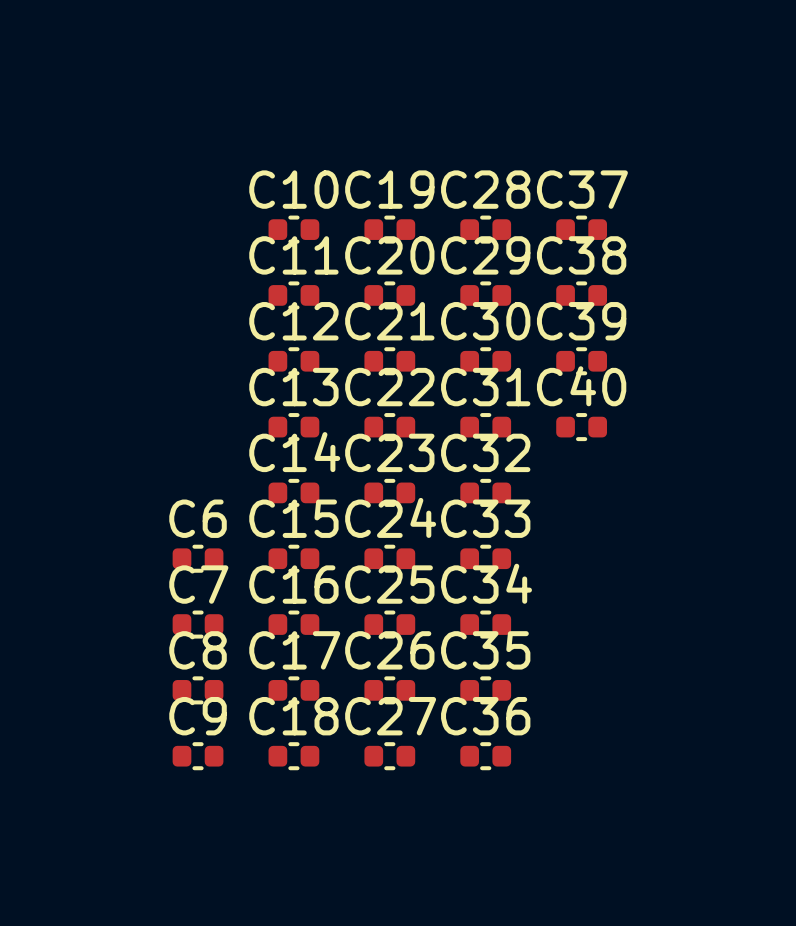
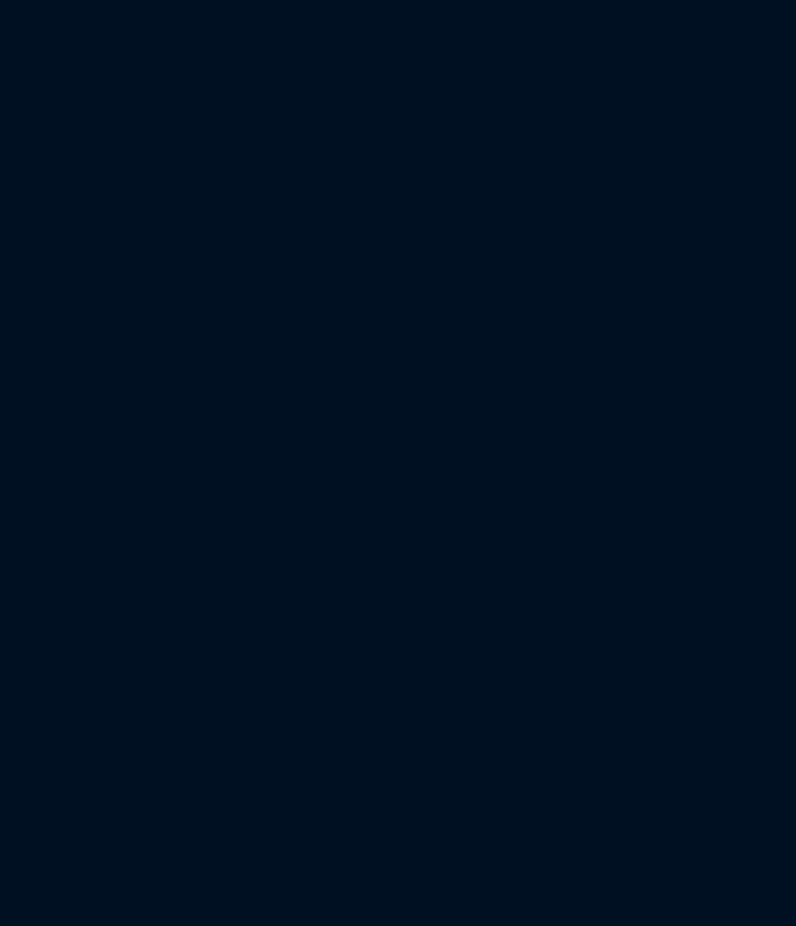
C10: (293, 229) -> none
C19: (389, 229) -> none
C28: (485, 229) -> none
C37: (581, 229) -> none
C11: (293, 295) -> none
C20: (389, 295) -> none
C29: (485, 295) -> none
C38: (581, 295) -> none
C12: (293, 361) -> none
C21: (389, 361) -> none
C30: (485, 361) -> none
C39: (581, 361) -> none
C13: (293, 427) -> none
C22: (389, 427) -> none
C31: (485, 427) -> none
C40: (581, 427) -> none
C14: (293, 492) -> none
C23: (389, 492) -> none
C32: (485, 492) -> none
C6: (198, 558) -> none
C15: (293, 558) -> none
C24: (389, 558) -> none
C33: (485, 558) -> none
C7: (198, 624) -> none
C16: (293, 624) -> none
C25: (389, 624) -> none
C34: (485, 624) -> none
C8: (198, 690) -> none
C17: (293, 690) -> none
C26: (389, 690) -> none
C35: (485, 690) -> none
C9: (198, 756) -> none
C18: (293, 756) -> none
C27: (389, 756) -> none
C36: (485, 756) -> none

